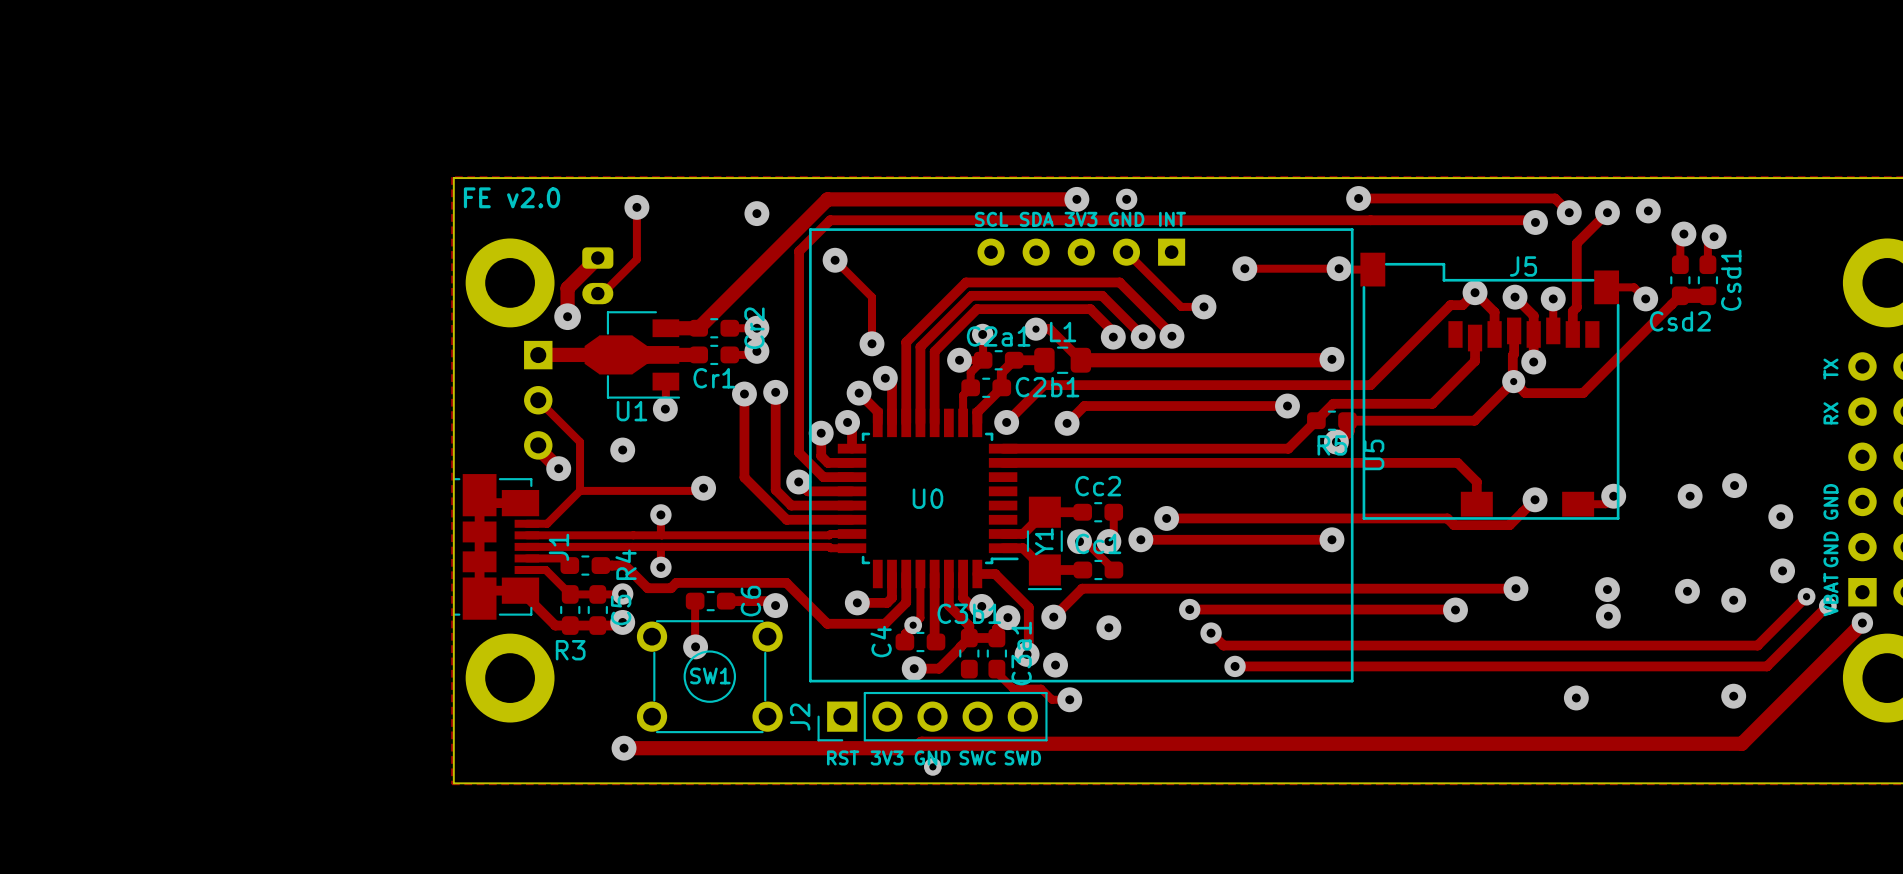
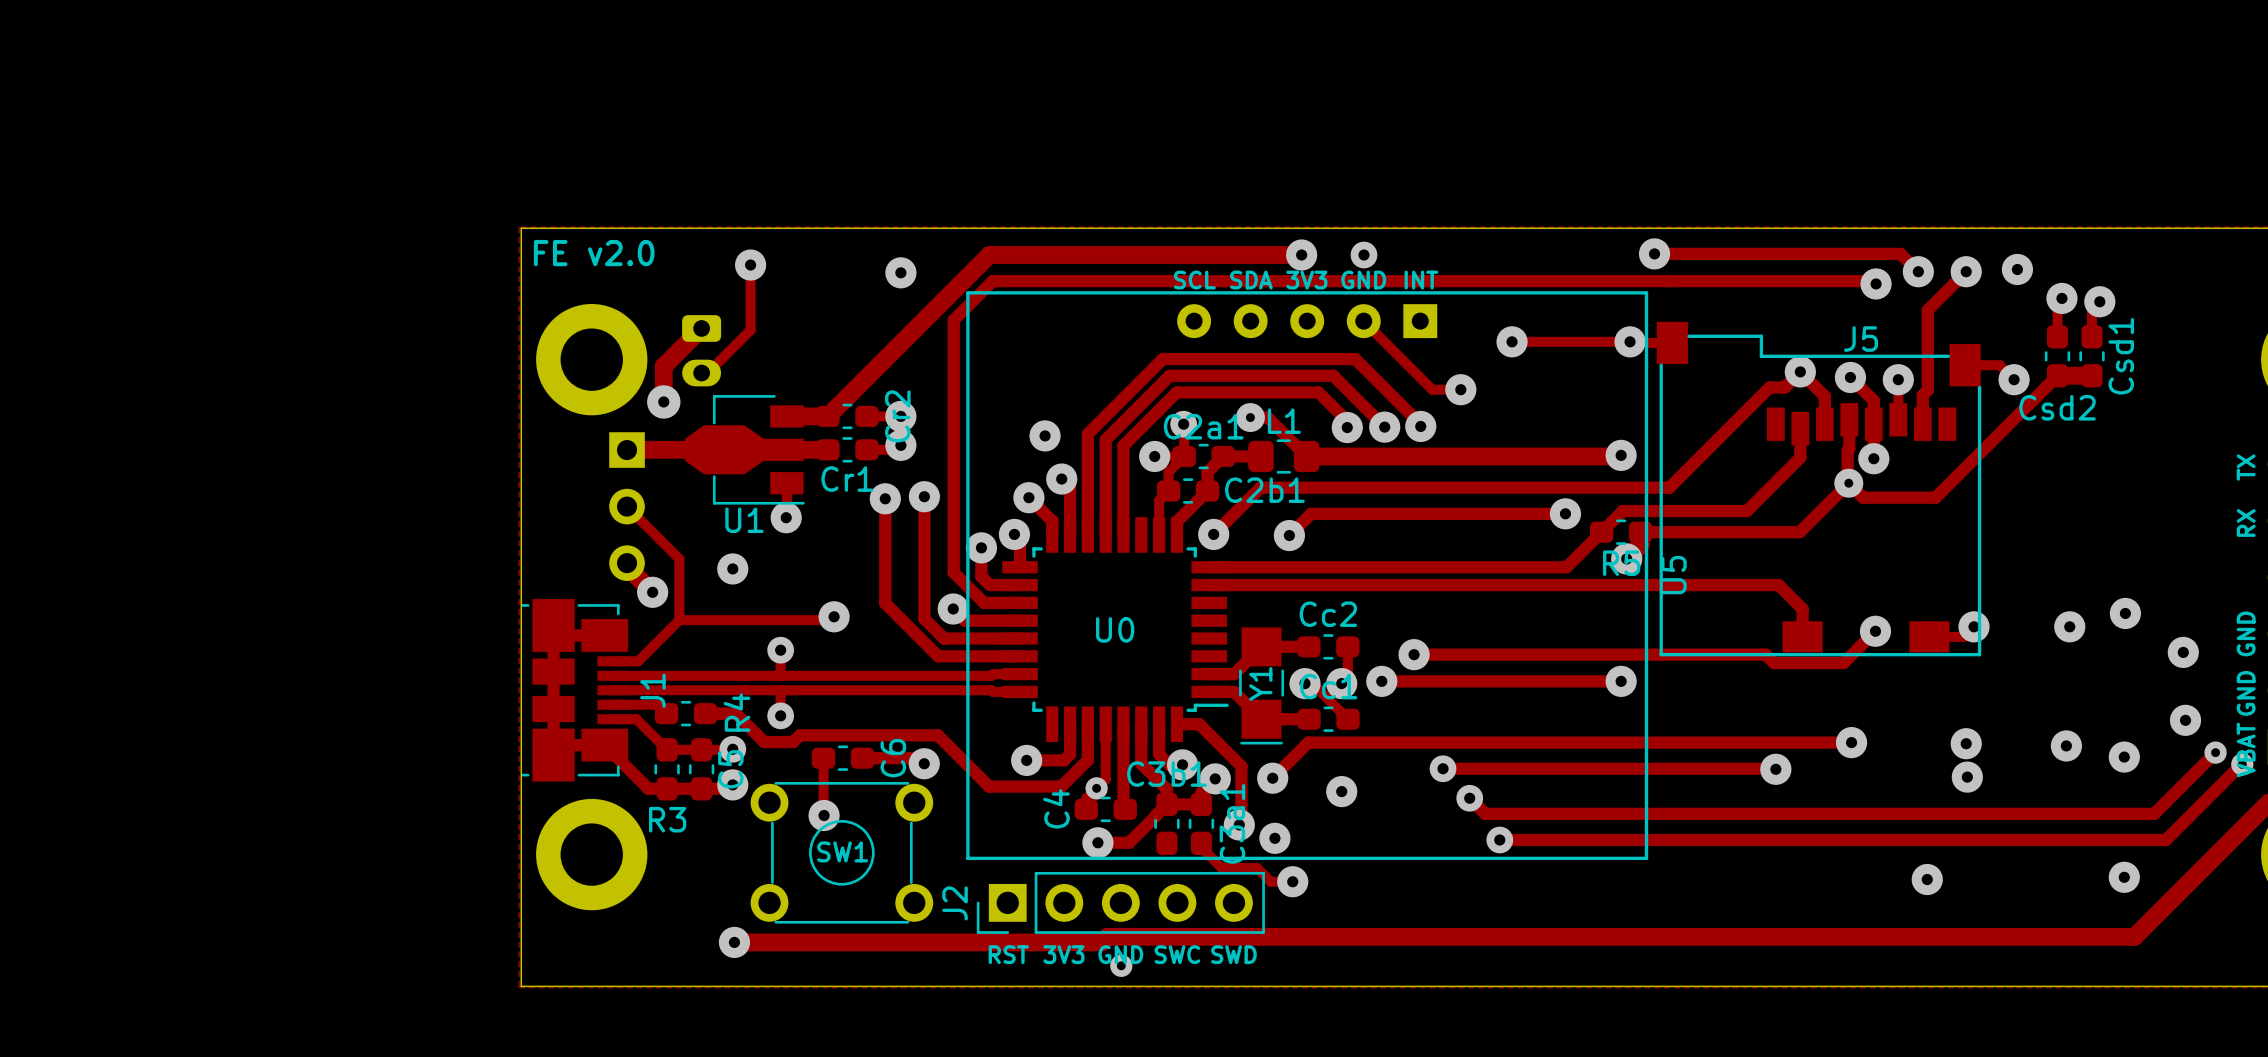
track: (835, 260) (872, 297) (872, 343) -> none
via: (835, 260) -> none

